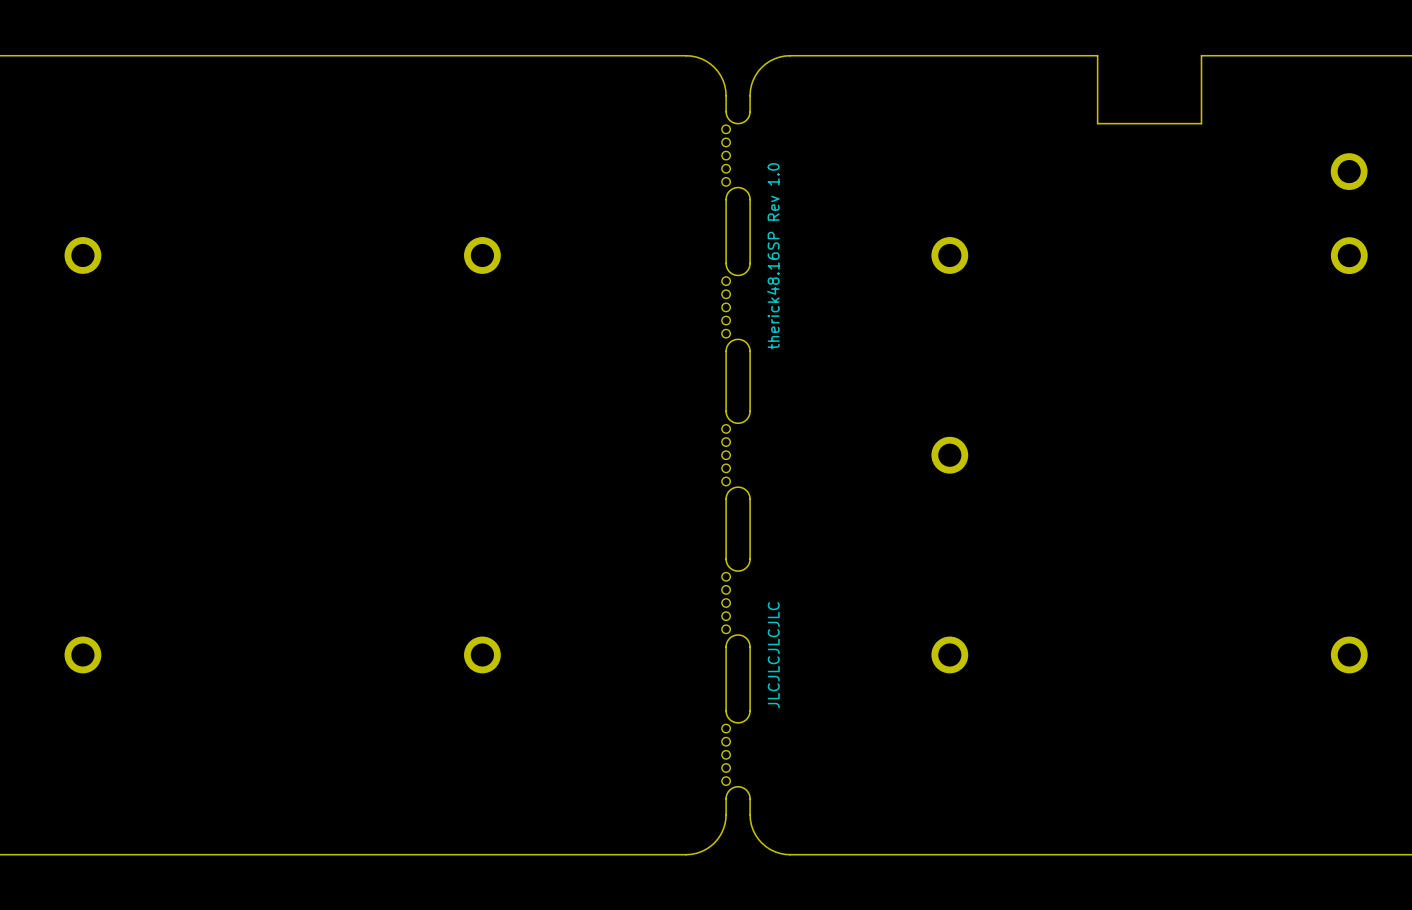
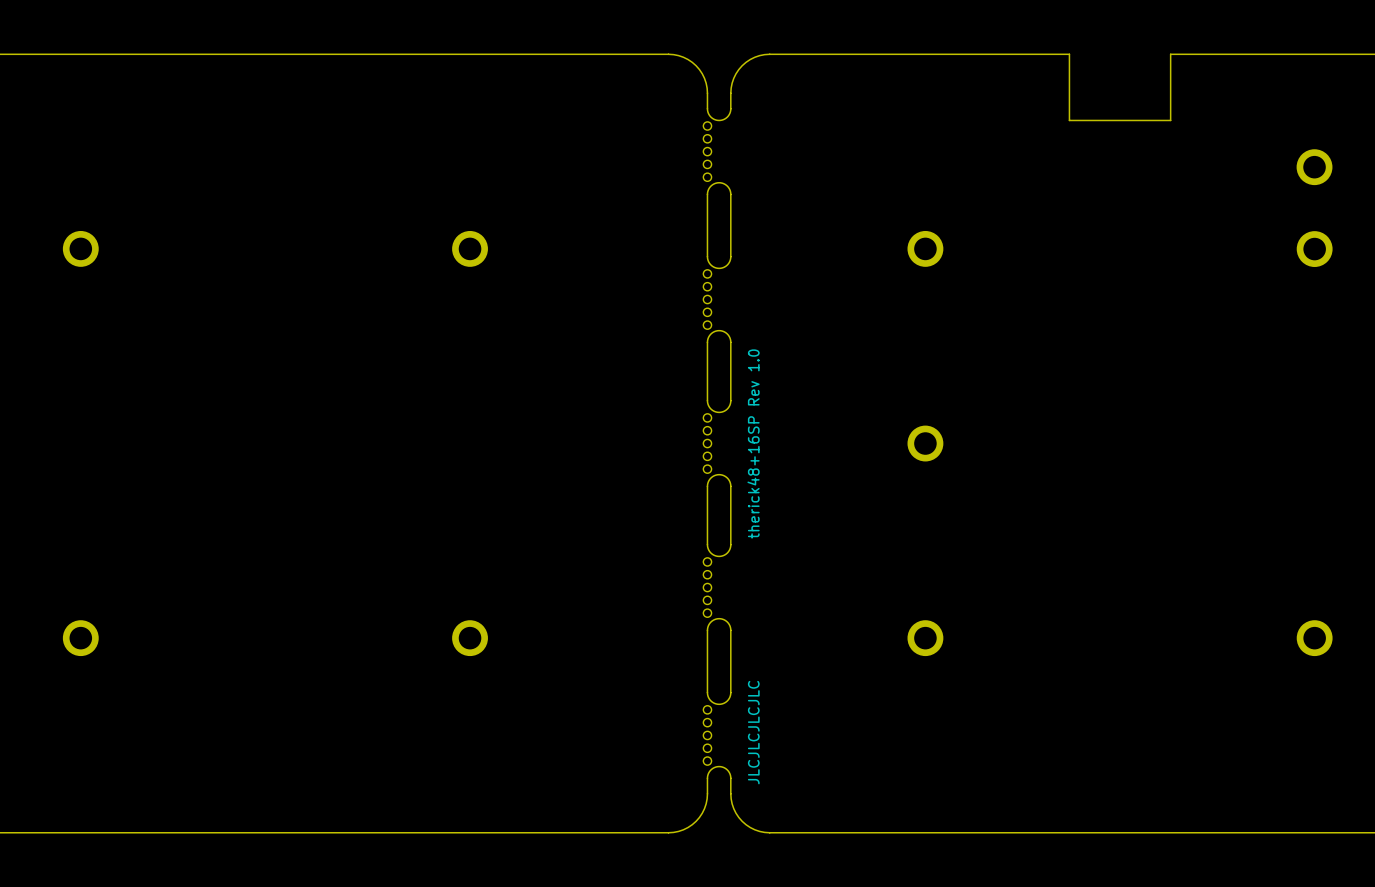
text: therick48.16SP Rev 1.0 (773, 256) -> therick48+16SP Rev 1.0 (753, 444)
text position: JLCJLCJLCJLC (773, 655) -> JLCJLCJLCJLC (753, 732)

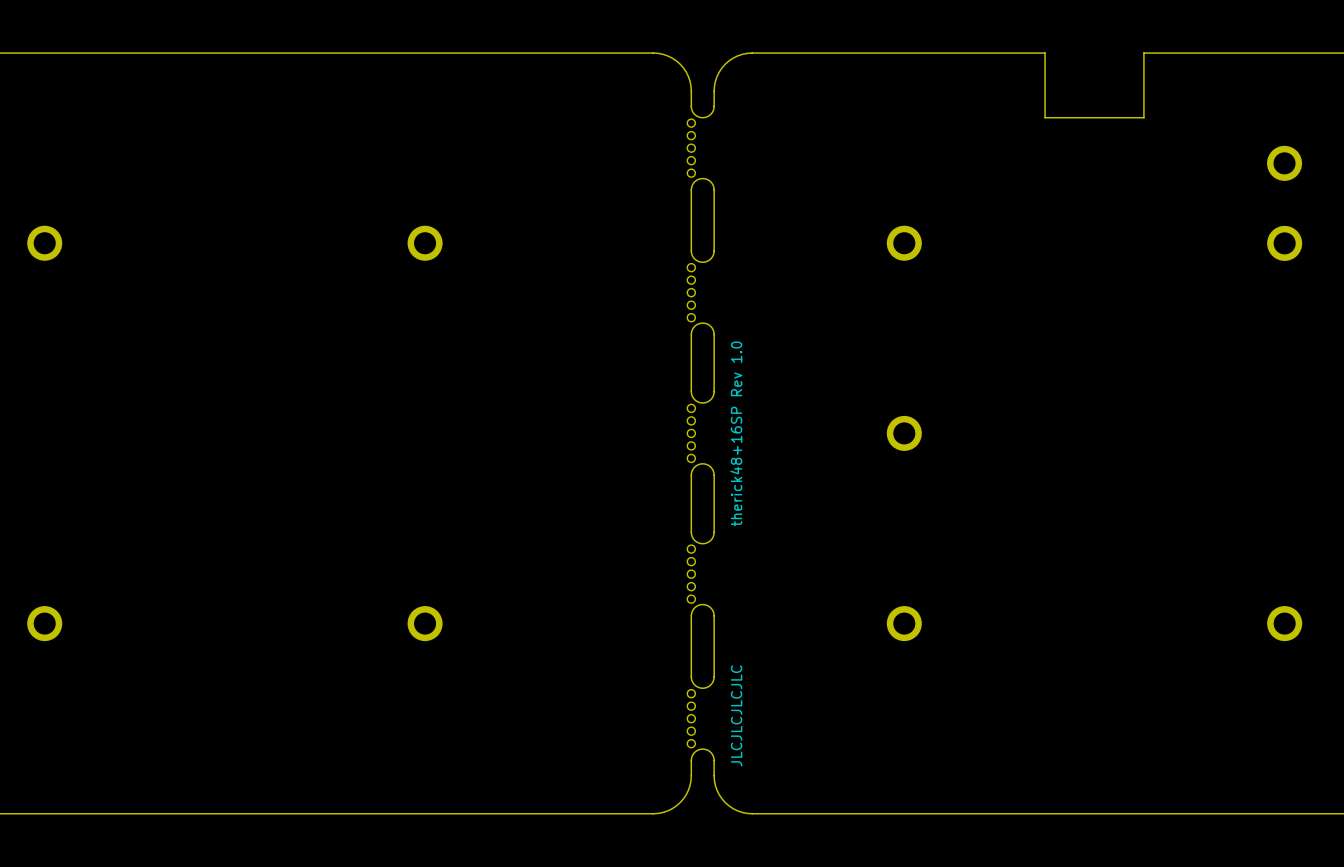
part position: (80, 248) -> (44, 243)
part position: (470, 248) -> (425, 243)
part position: (80, 638) -> (44, 623)
part position: (470, 638) -> (425, 623)

